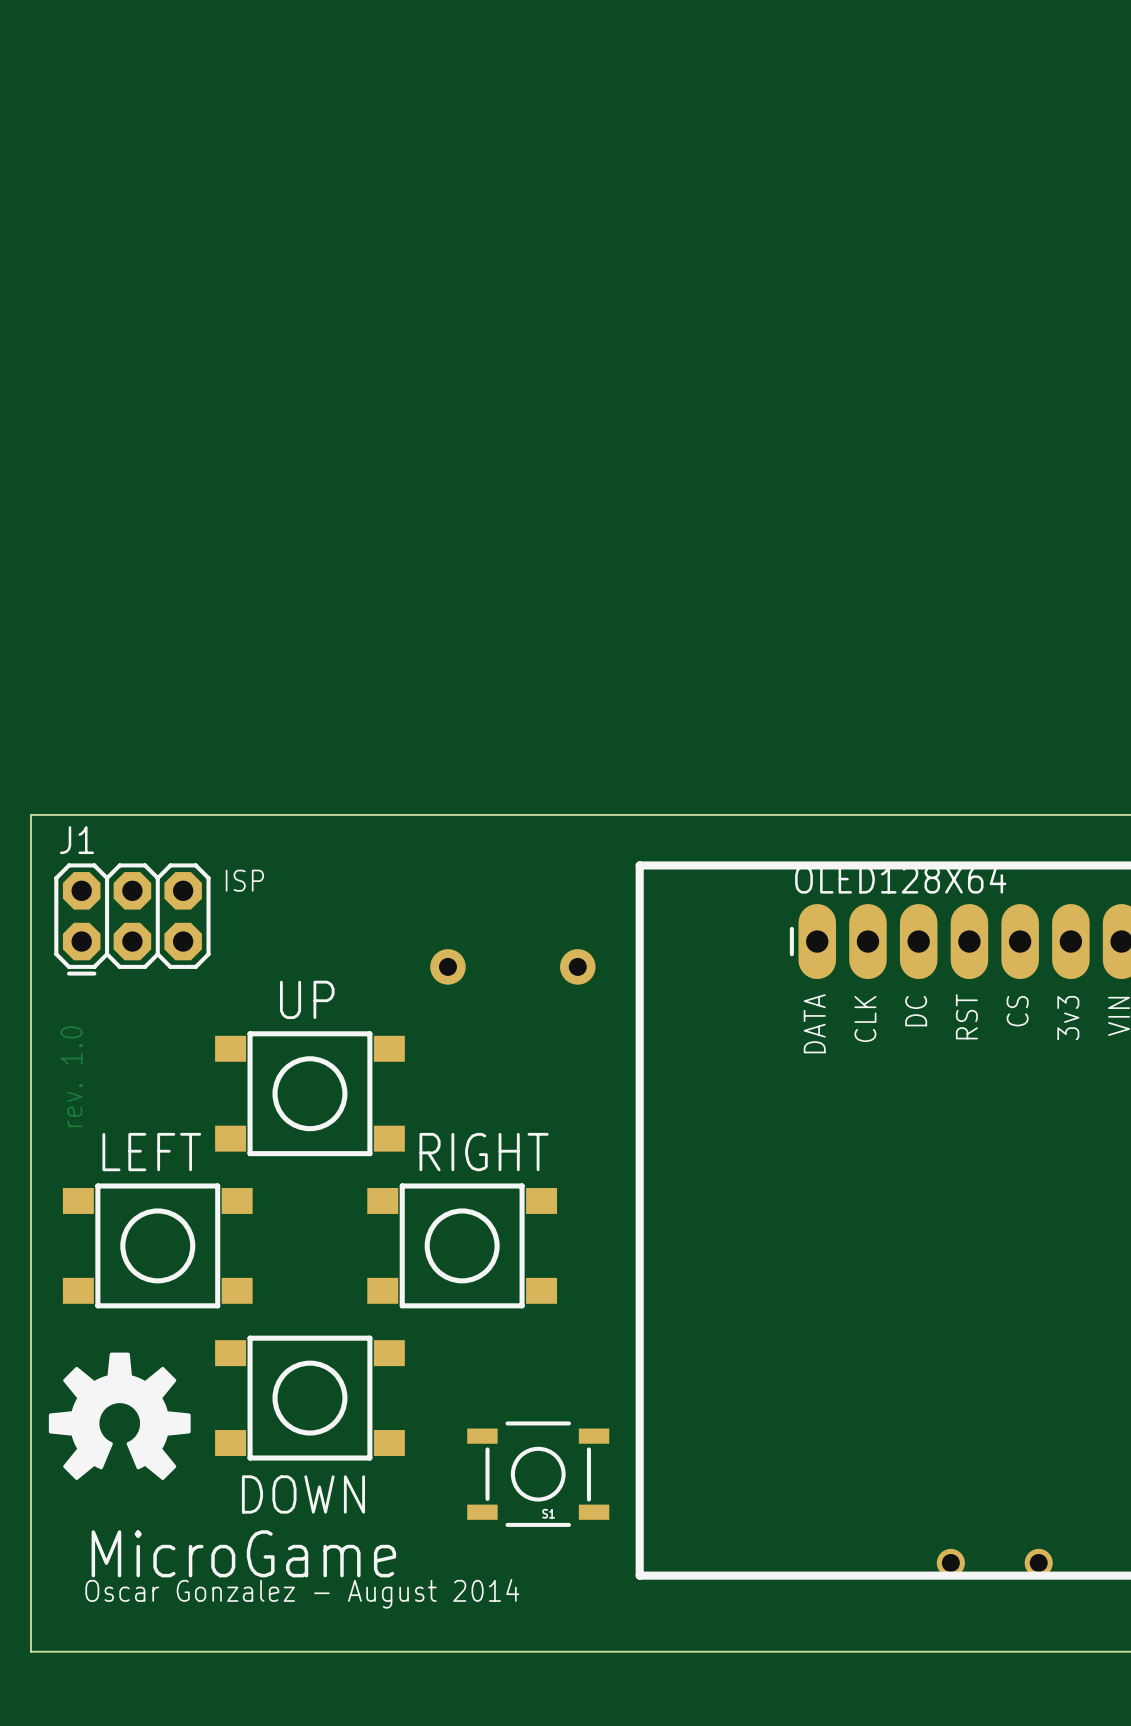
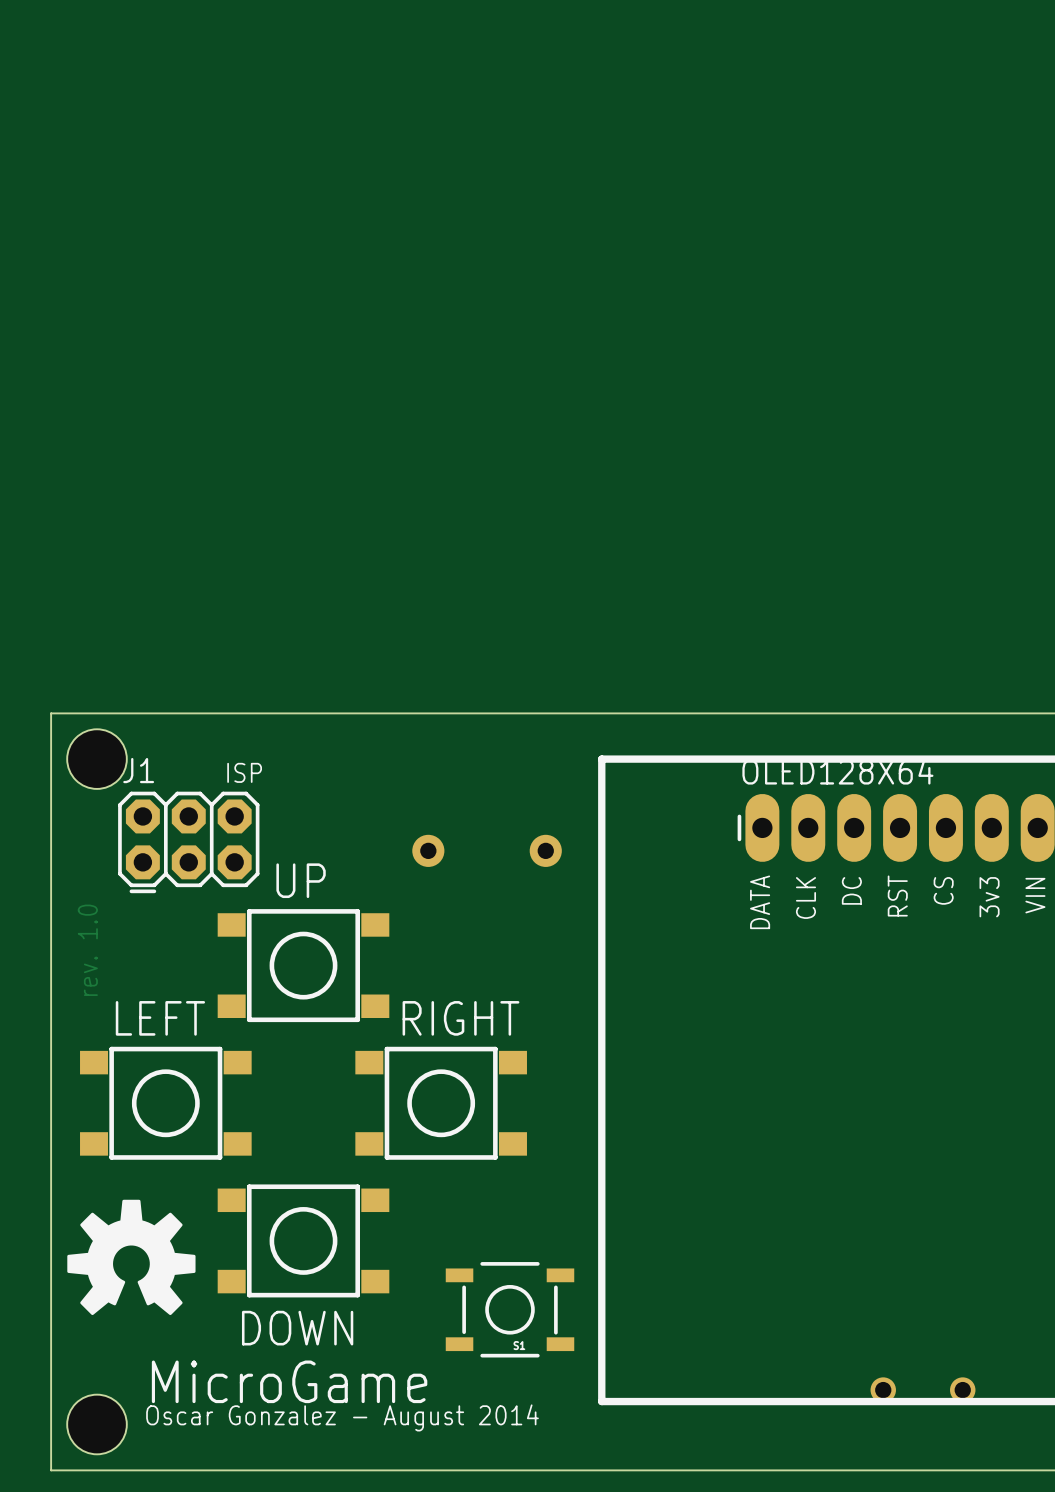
part: none -> (97, 759)
J1 position: (132, 919) -> (188, 842)
text position: MicroGame (243, 1553) -> MicroGame (289, 1381)
text position: Oscar Gonzalez - August 2014 (302, 1593) -> Oscar Gonzalez - August 2014 (342, 1417)
part: none -> (97, 1424)

